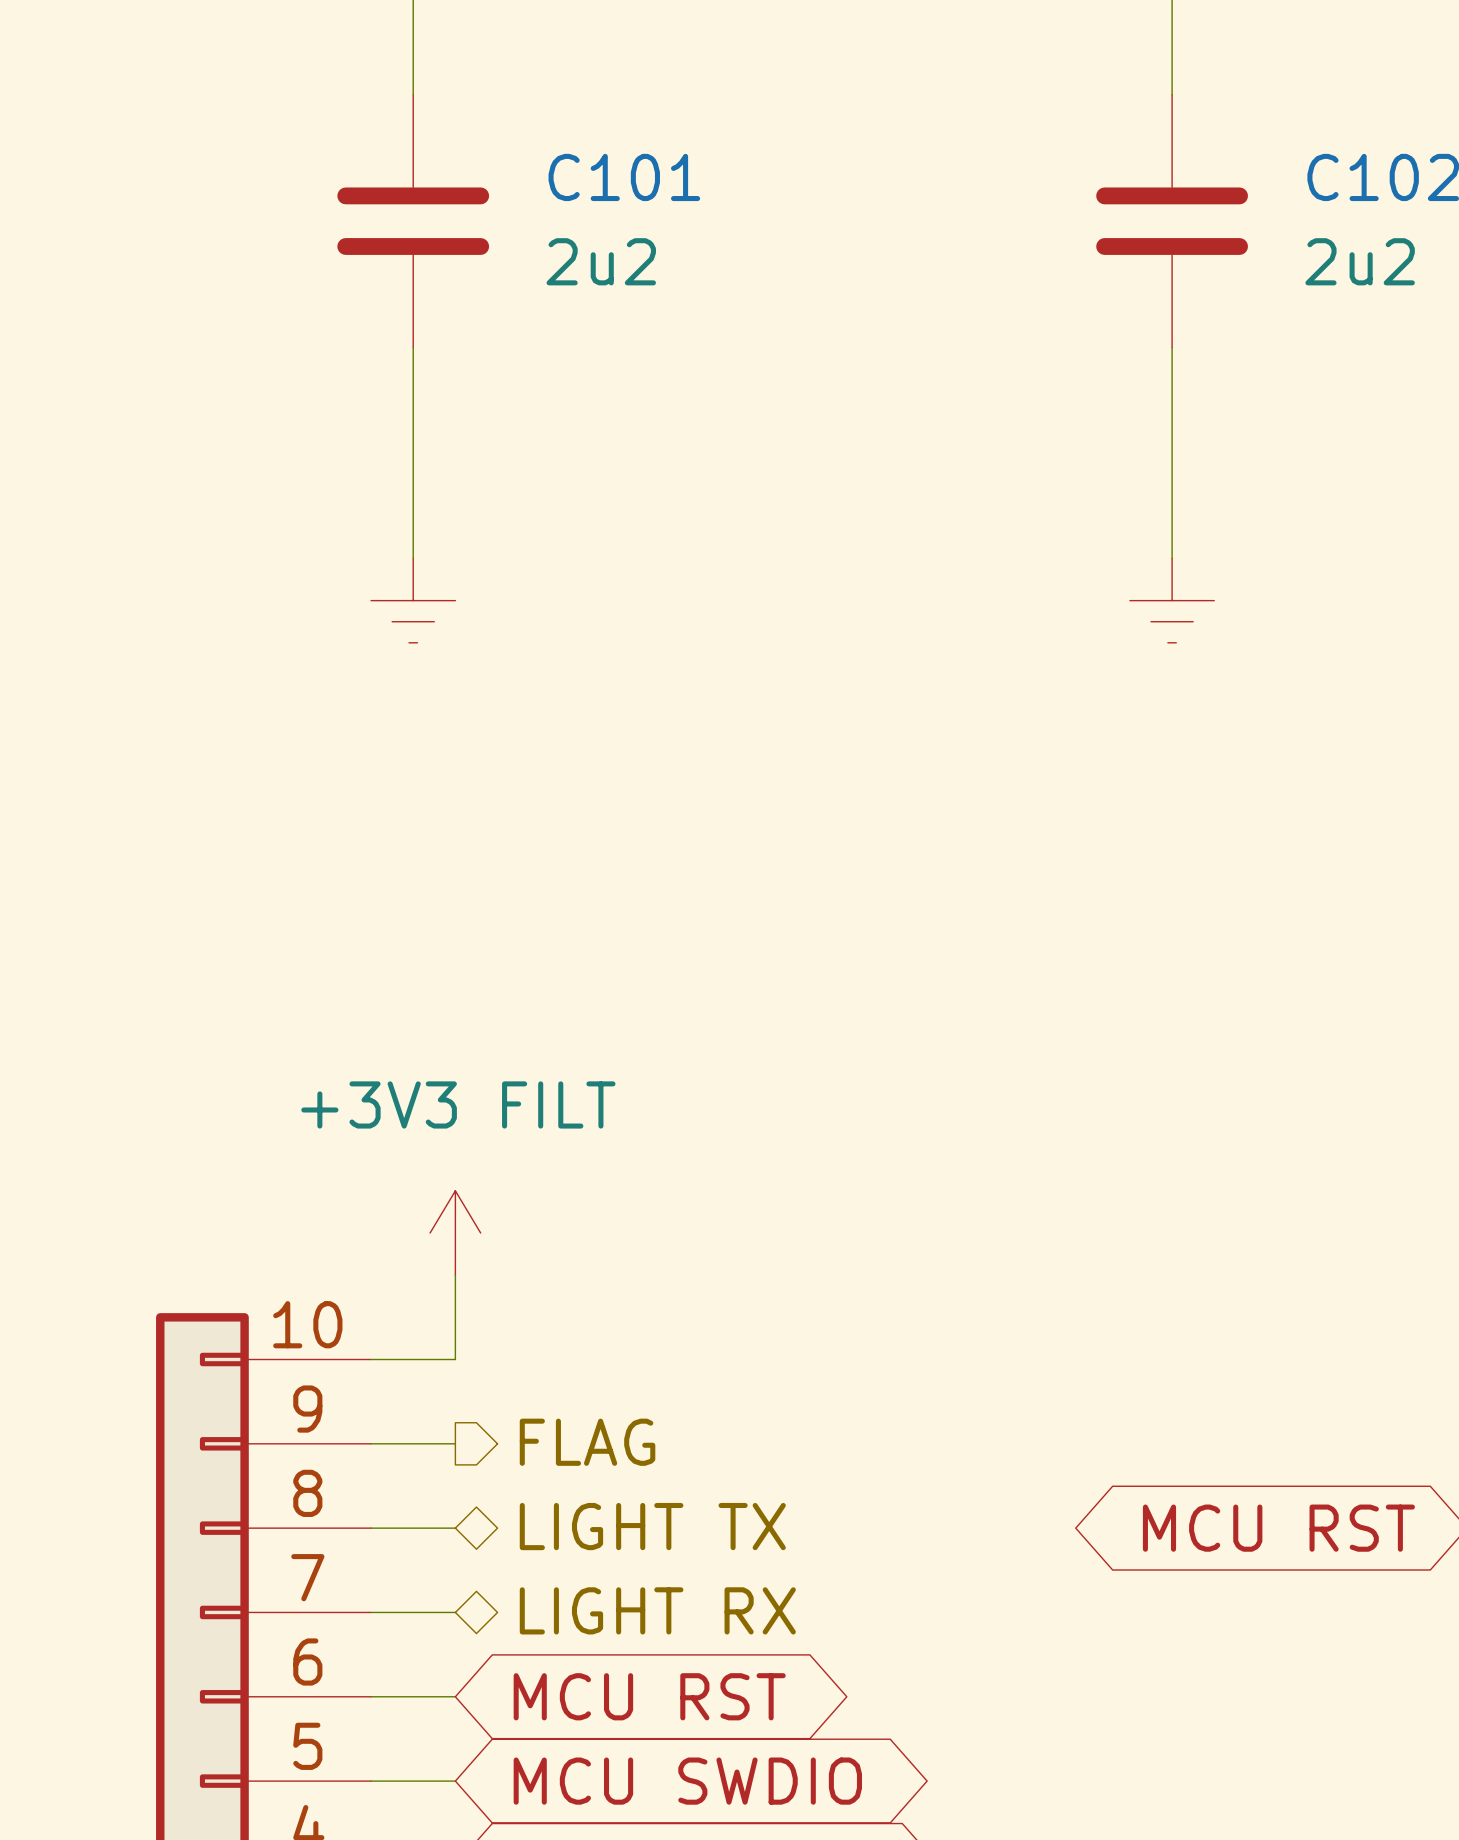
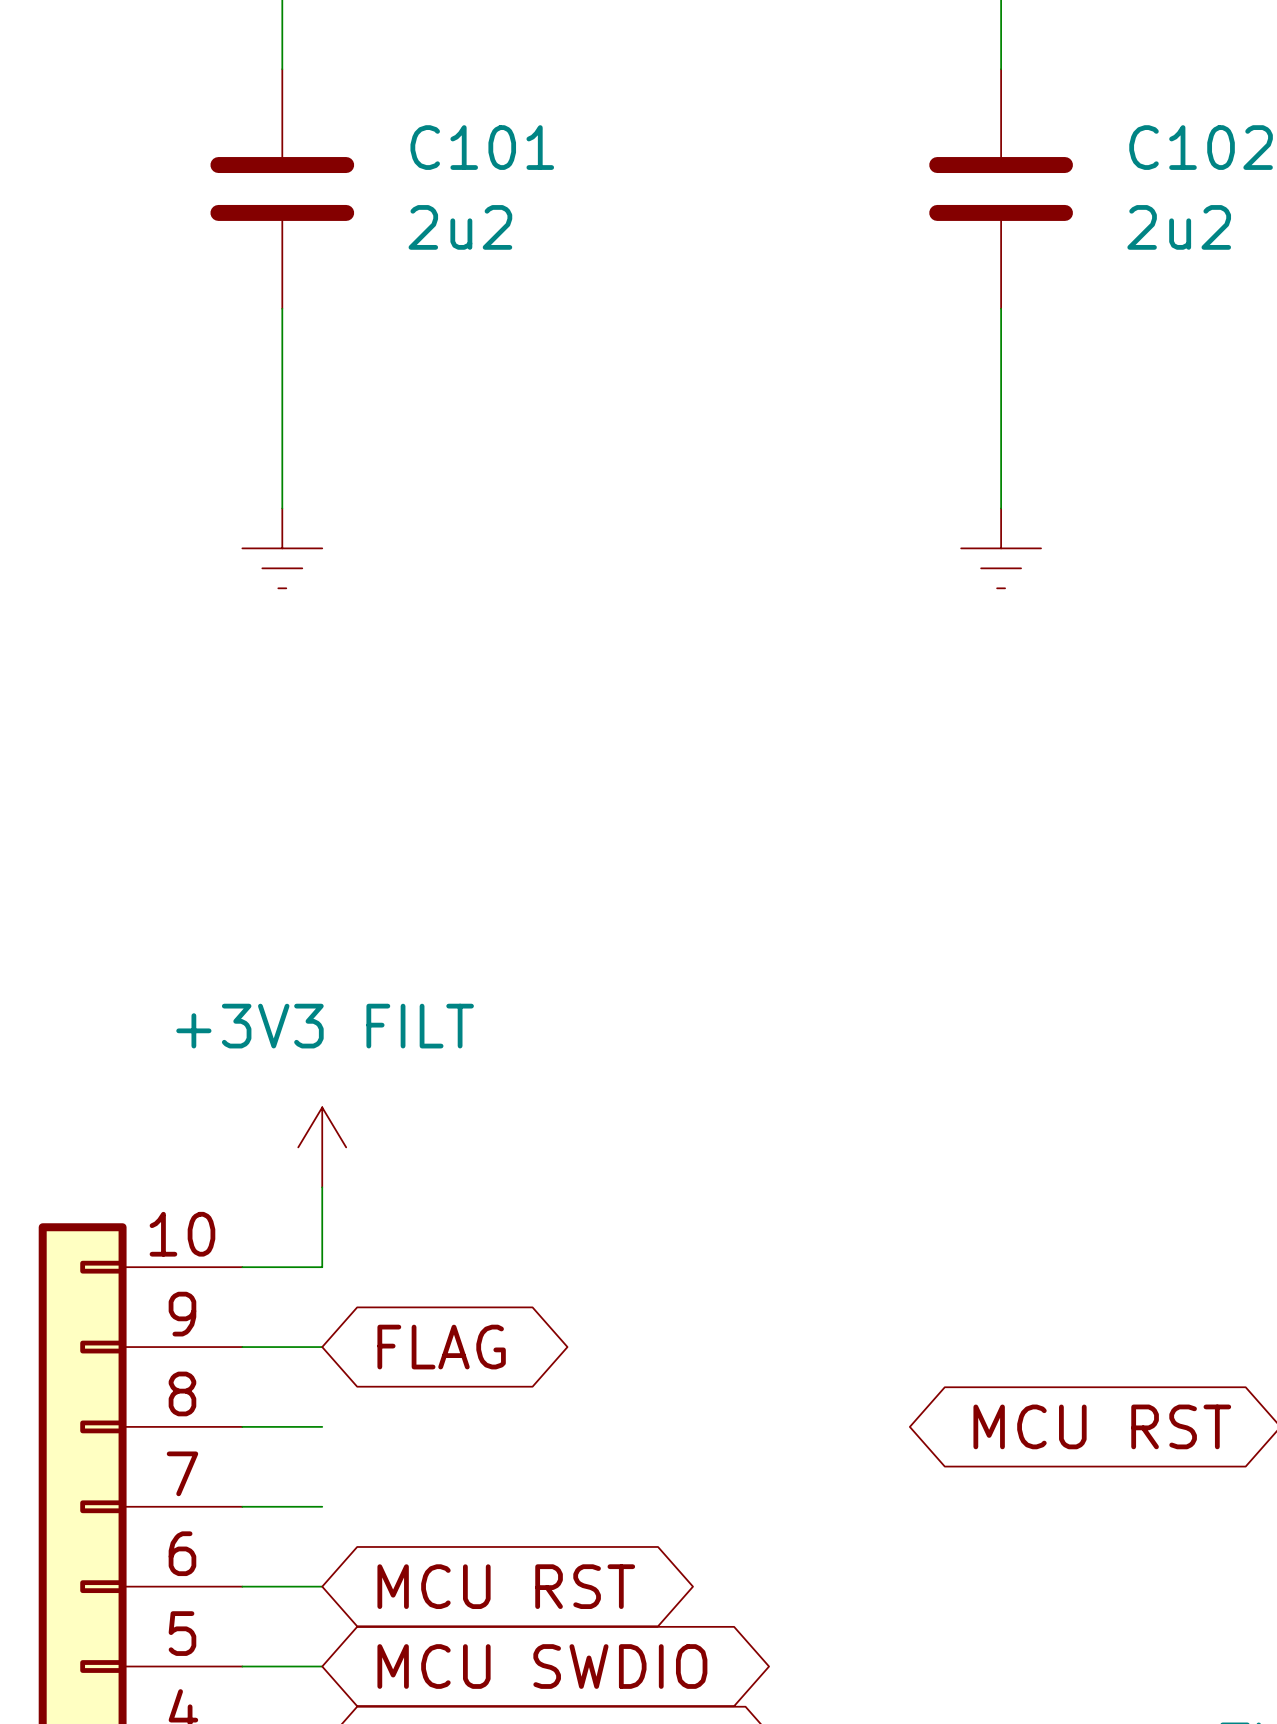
hierarchical label: FLAG (587, 1442) -> none
global label: none -> FLAG (441, 1347)
hierarchical label: LIGHT TX (652, 1526) -> none
hierarchical label: LIGHT RX (657, 1610) -> none

